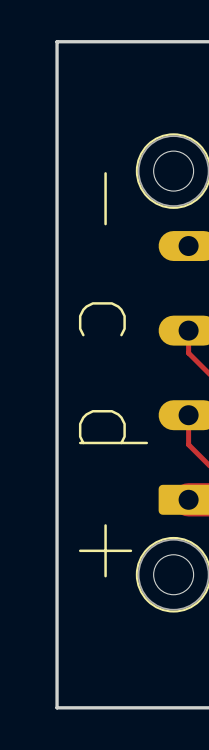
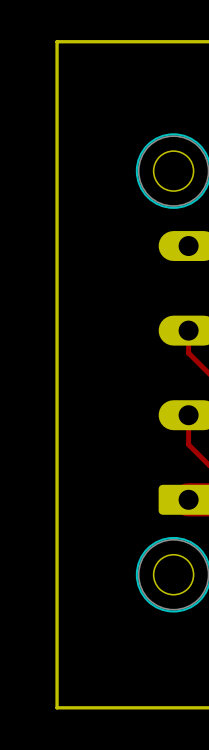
text: - c d + (113, 374) -> none

